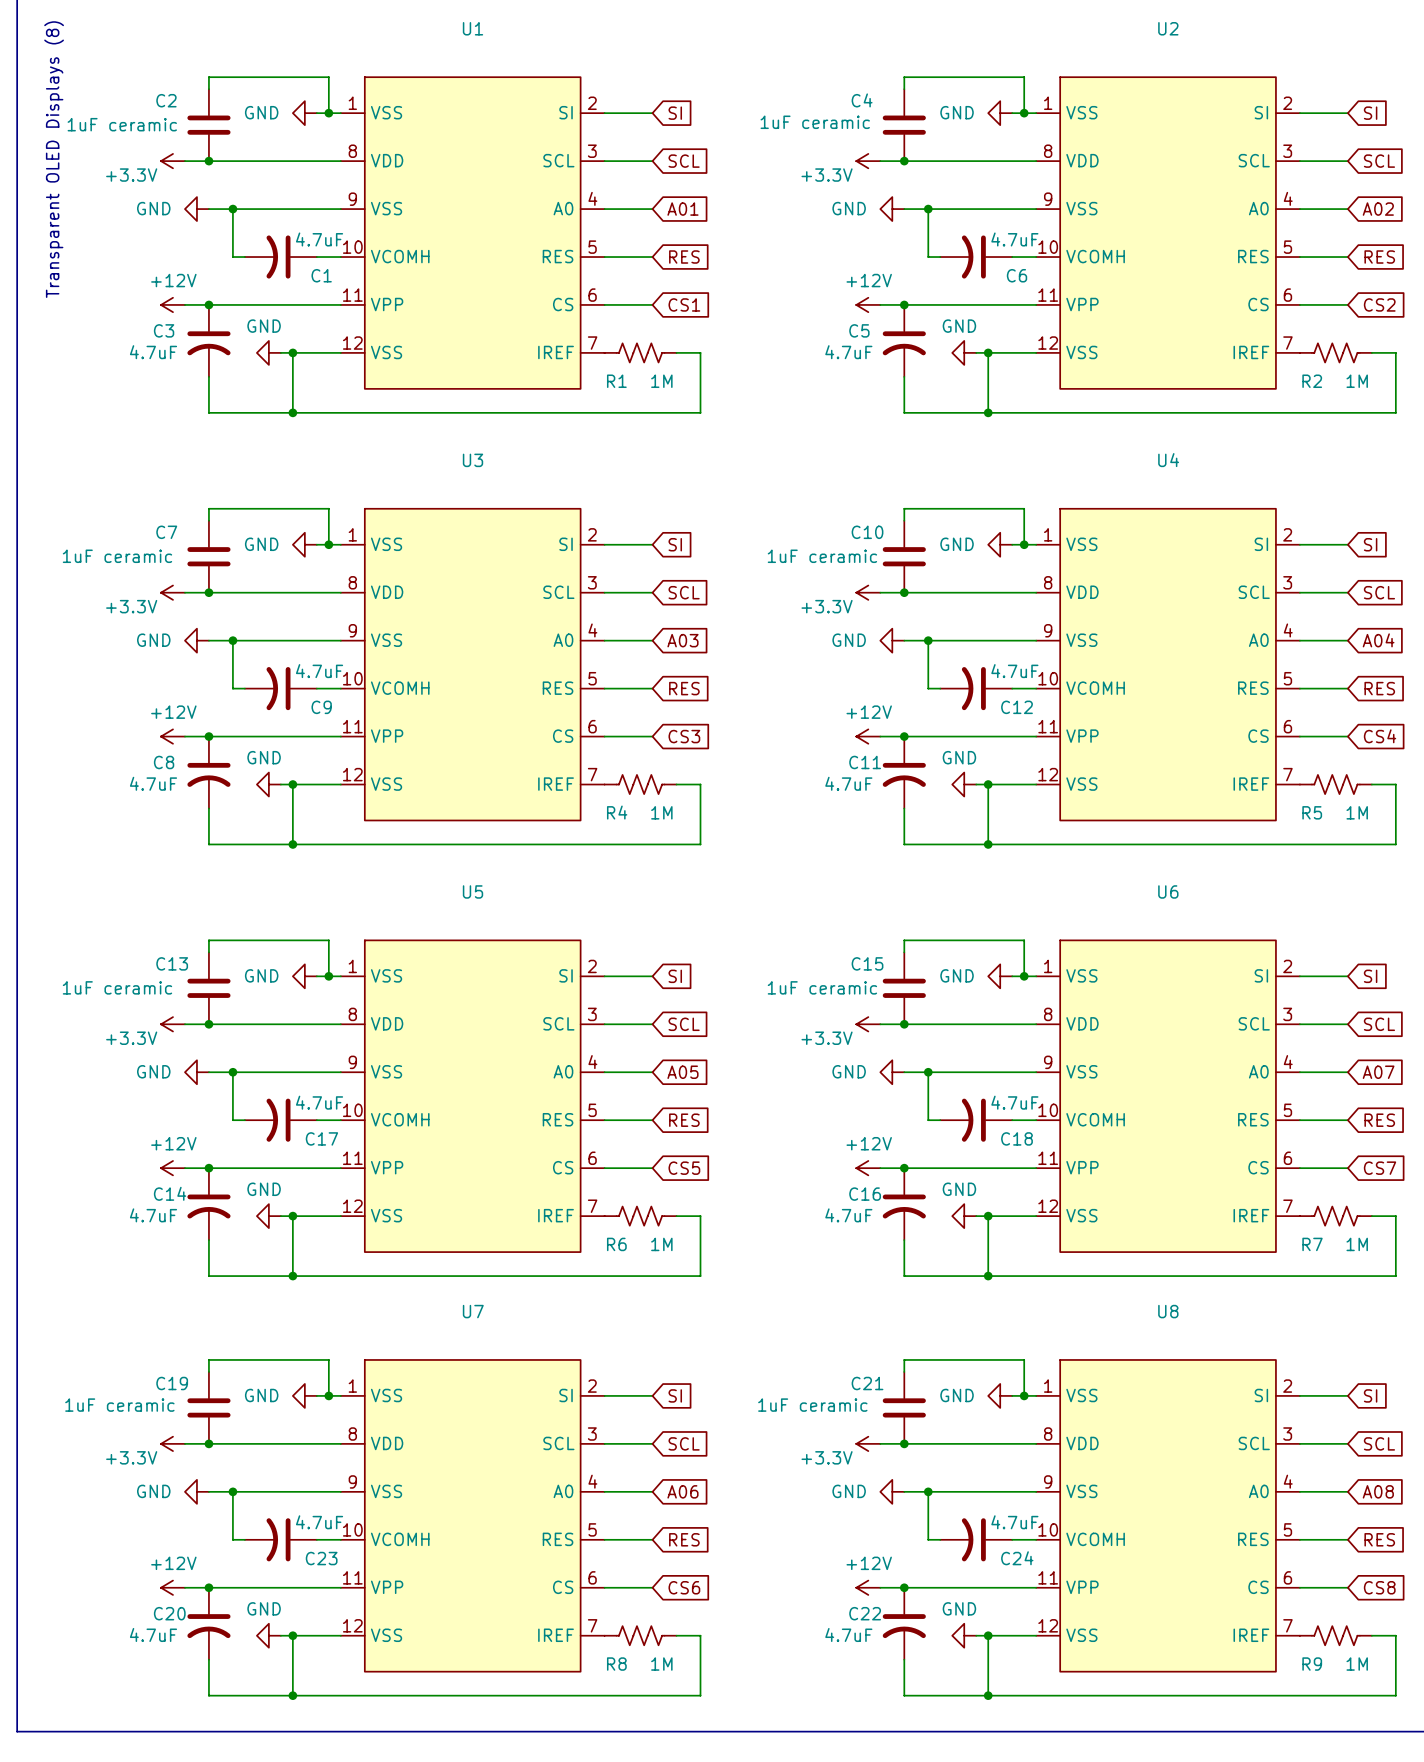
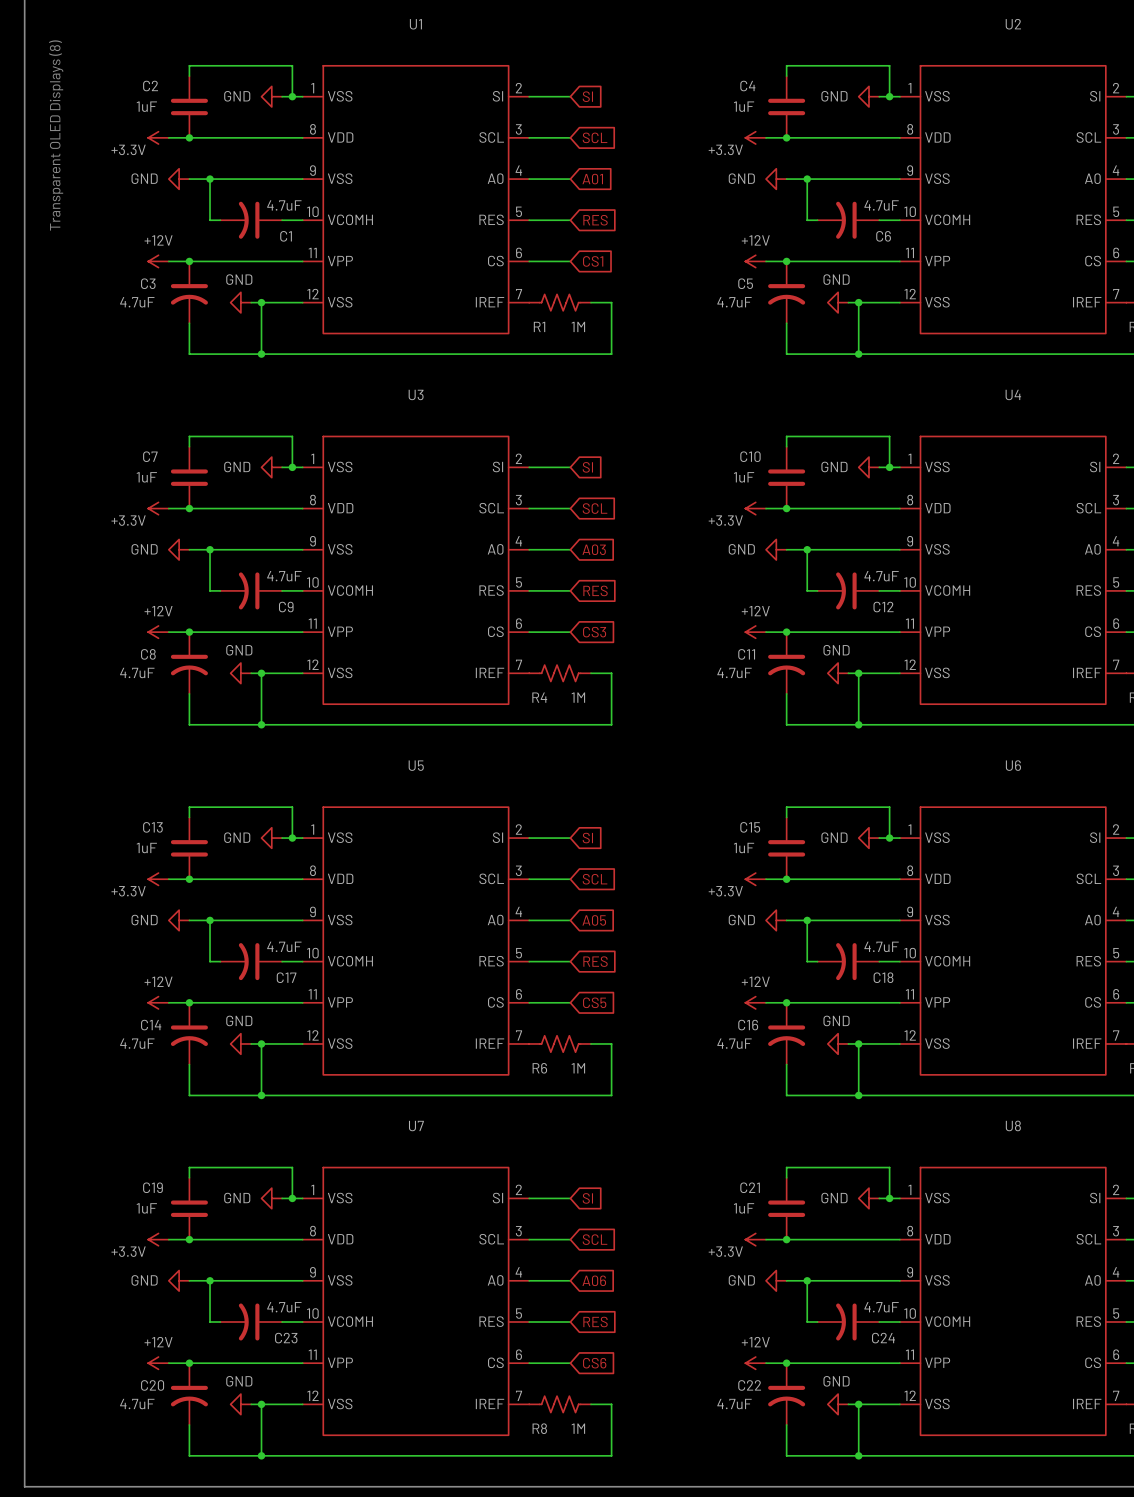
C4 value: 1uF ceramic (815, 122) -> 1uF (744, 106)
C2 value: 1uF ceramic (122, 124) -> 1uF (146, 106)
C7 value: 1uF ceramic (117, 556) -> 1uF (146, 477)
C10 value: 1uF ceramic (822, 556) -> 1uF (744, 477)
C13 value: 1uF ceramic (117, 987) -> 1uF (146, 848)
C15 value: 1uF ceramic (822, 987) -> 1uF (744, 848)
C19 value: 1uF ceramic (119, 1405) -> 1uF (146, 1208)
C21 value: 1uF ceramic (812, 1405) -> 1uF (744, 1208)

